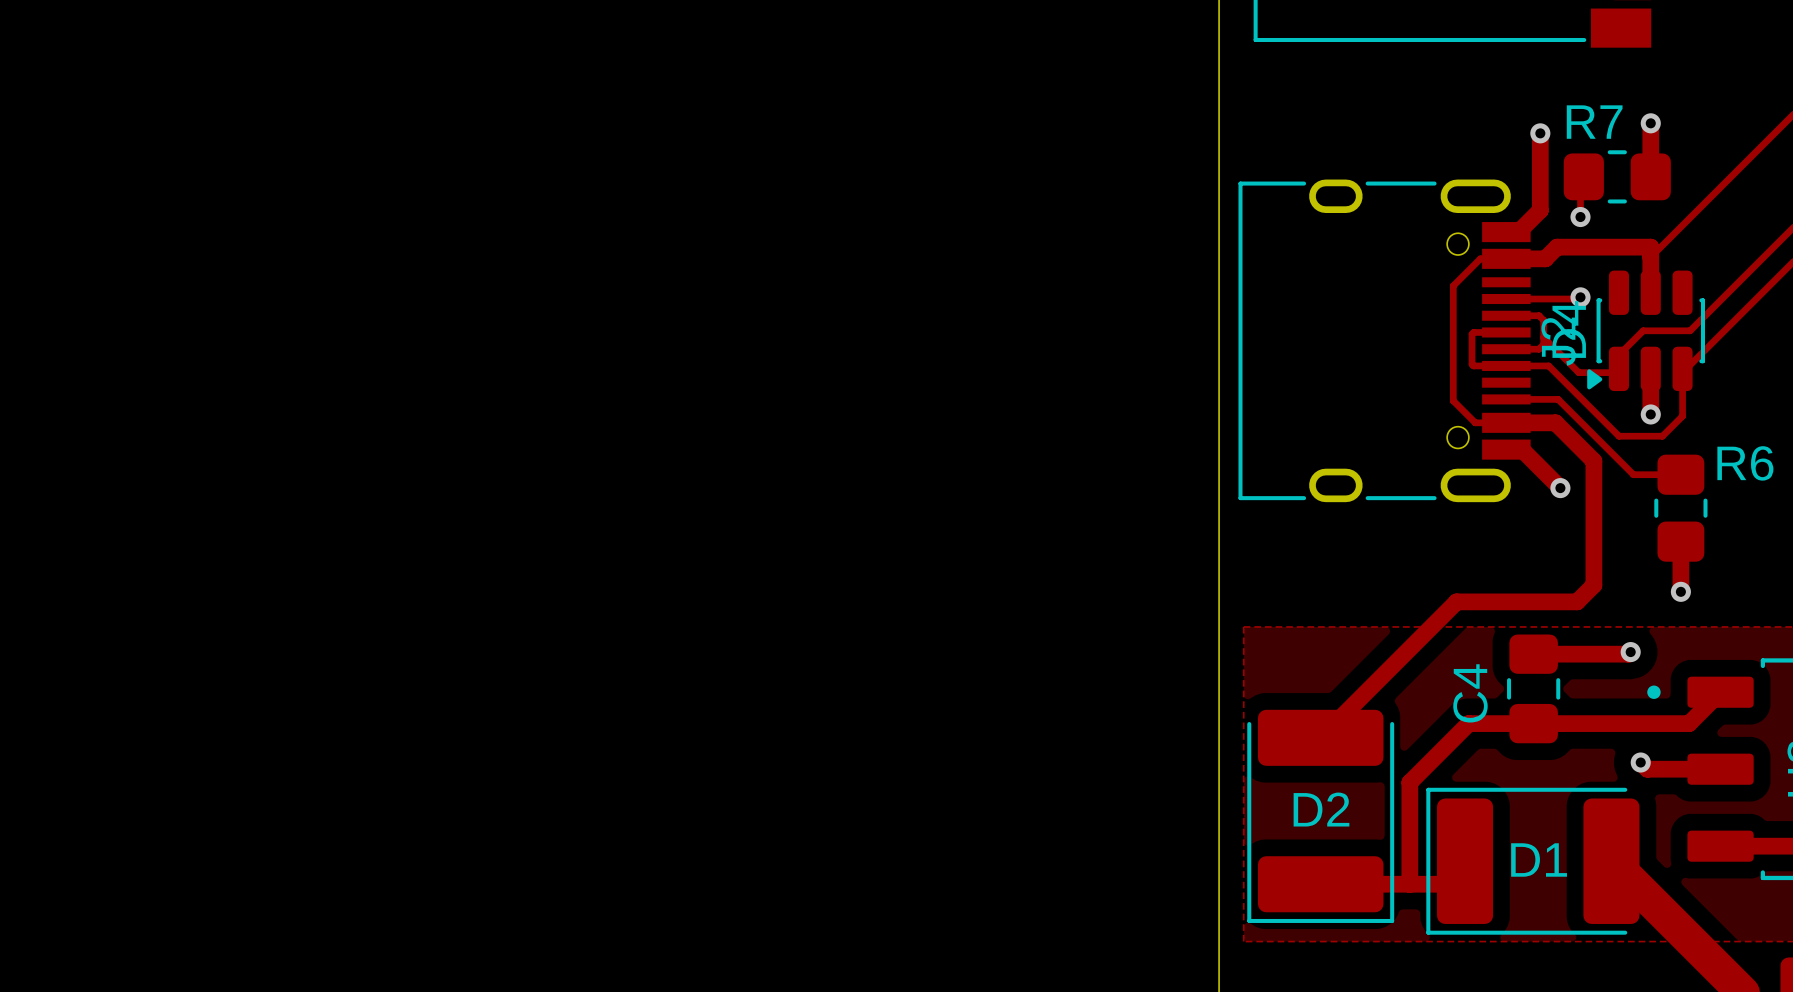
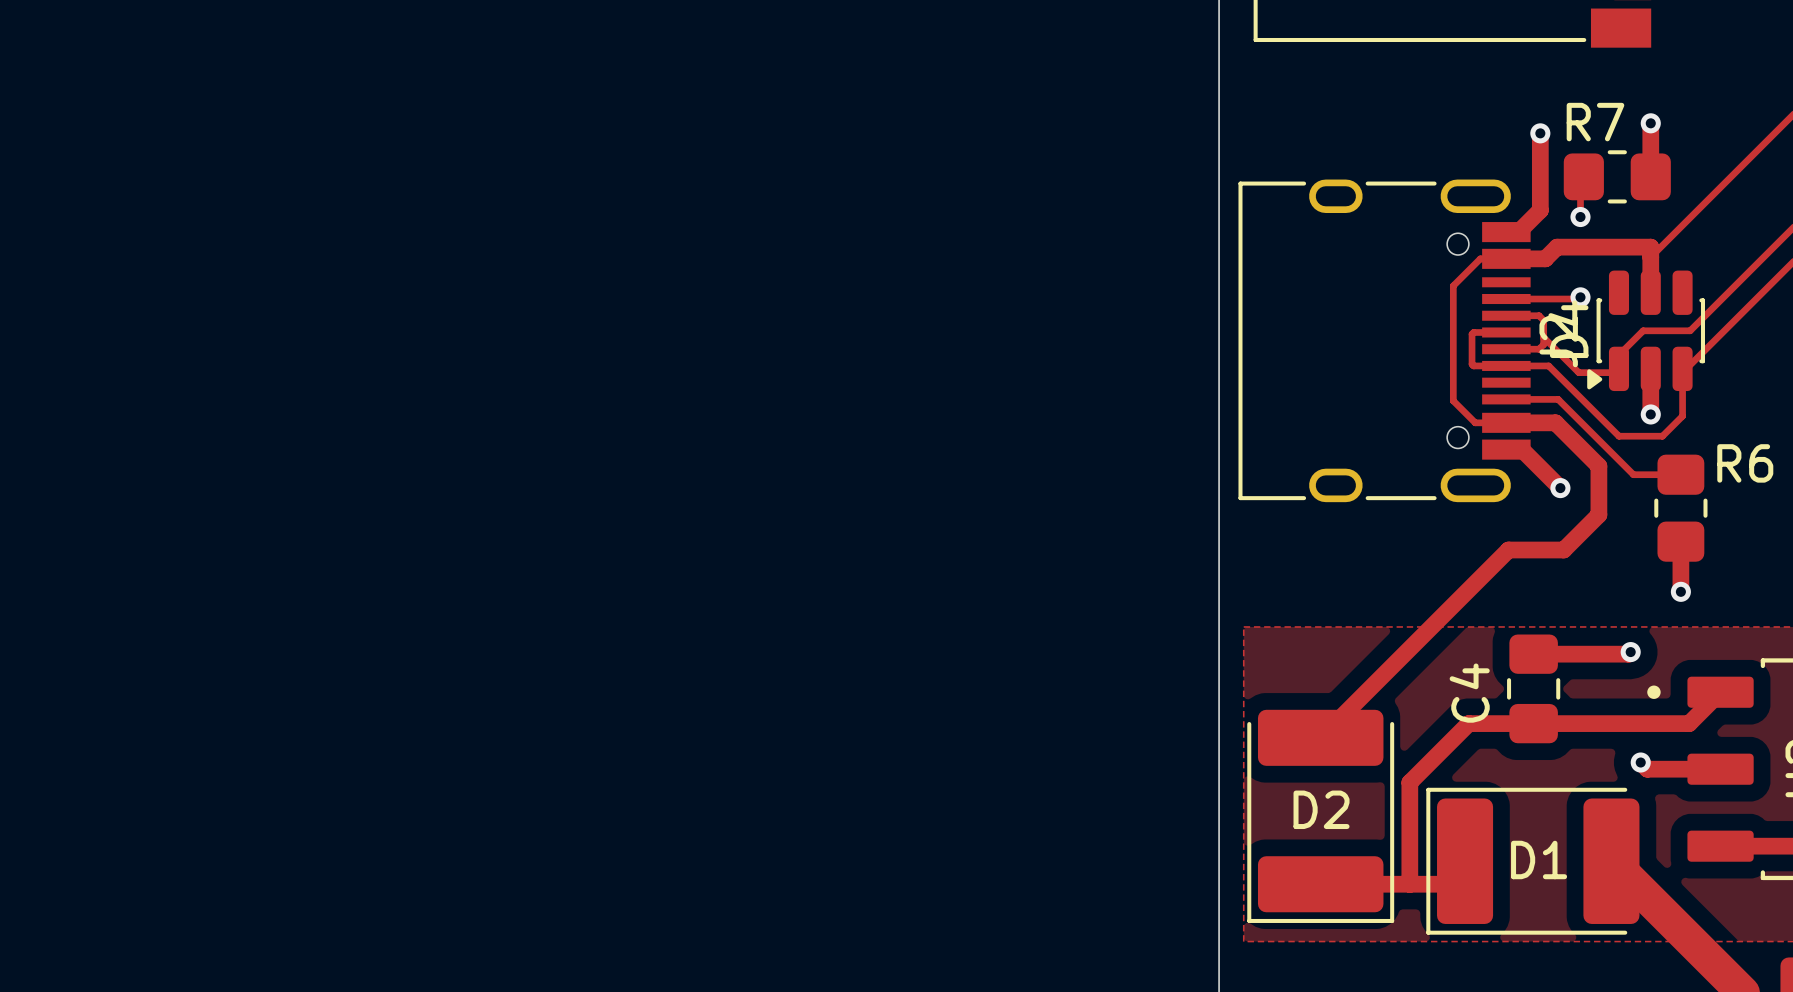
track: (1593, 461) (1593, 585) (1577, 601) (1456, 601) -> (1593, 461) (1598, 466) (1598, 514) (1563, 550) (1508, 550) (1456, 601)

